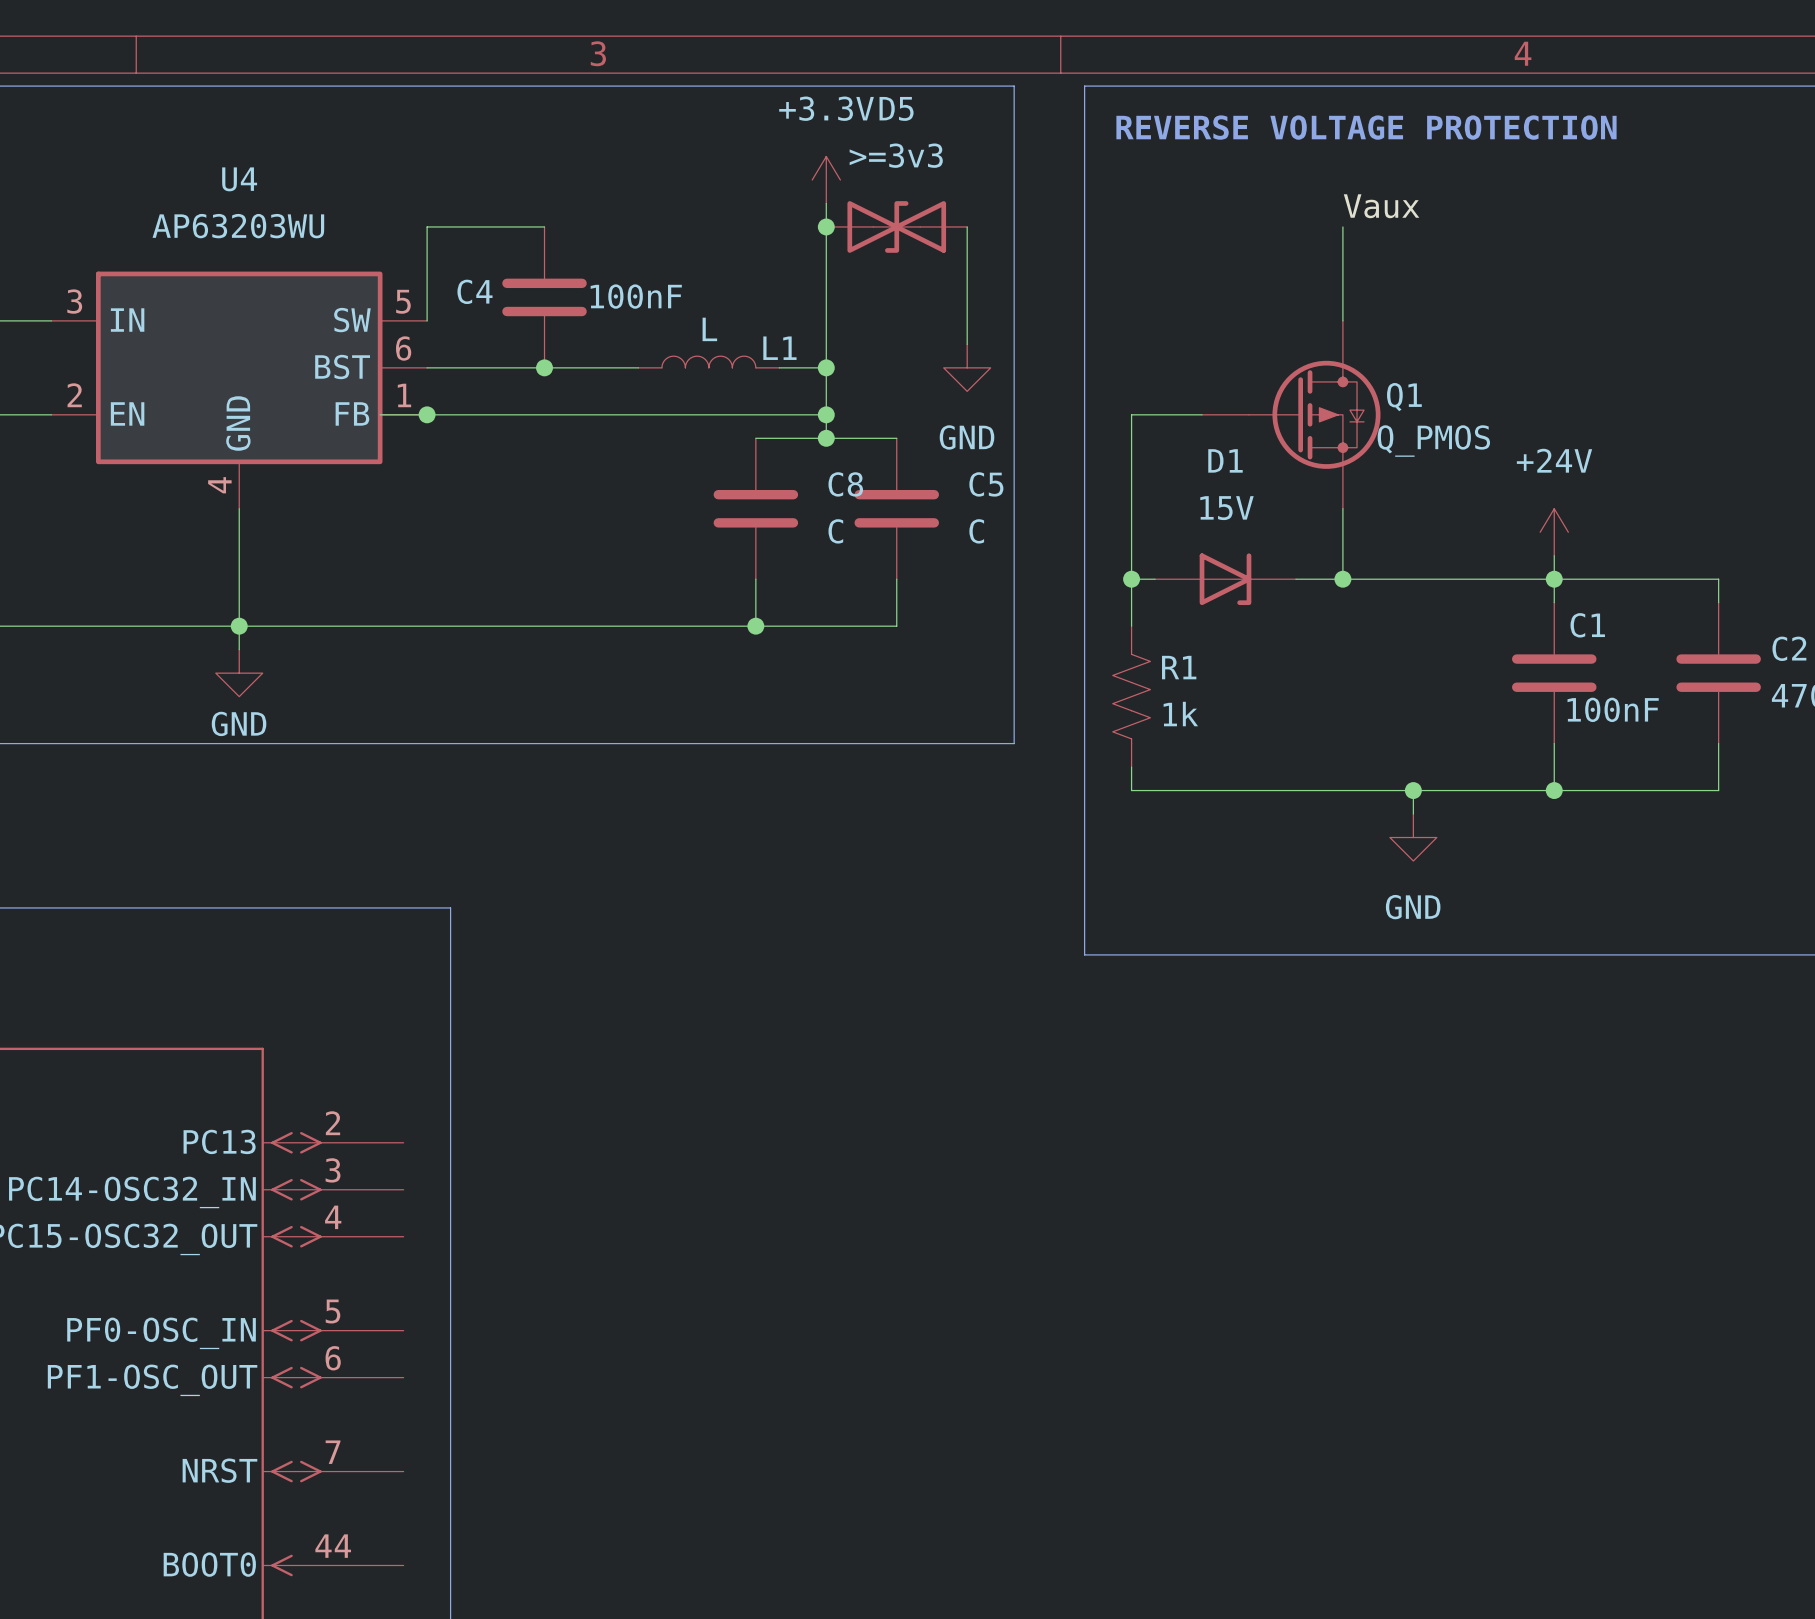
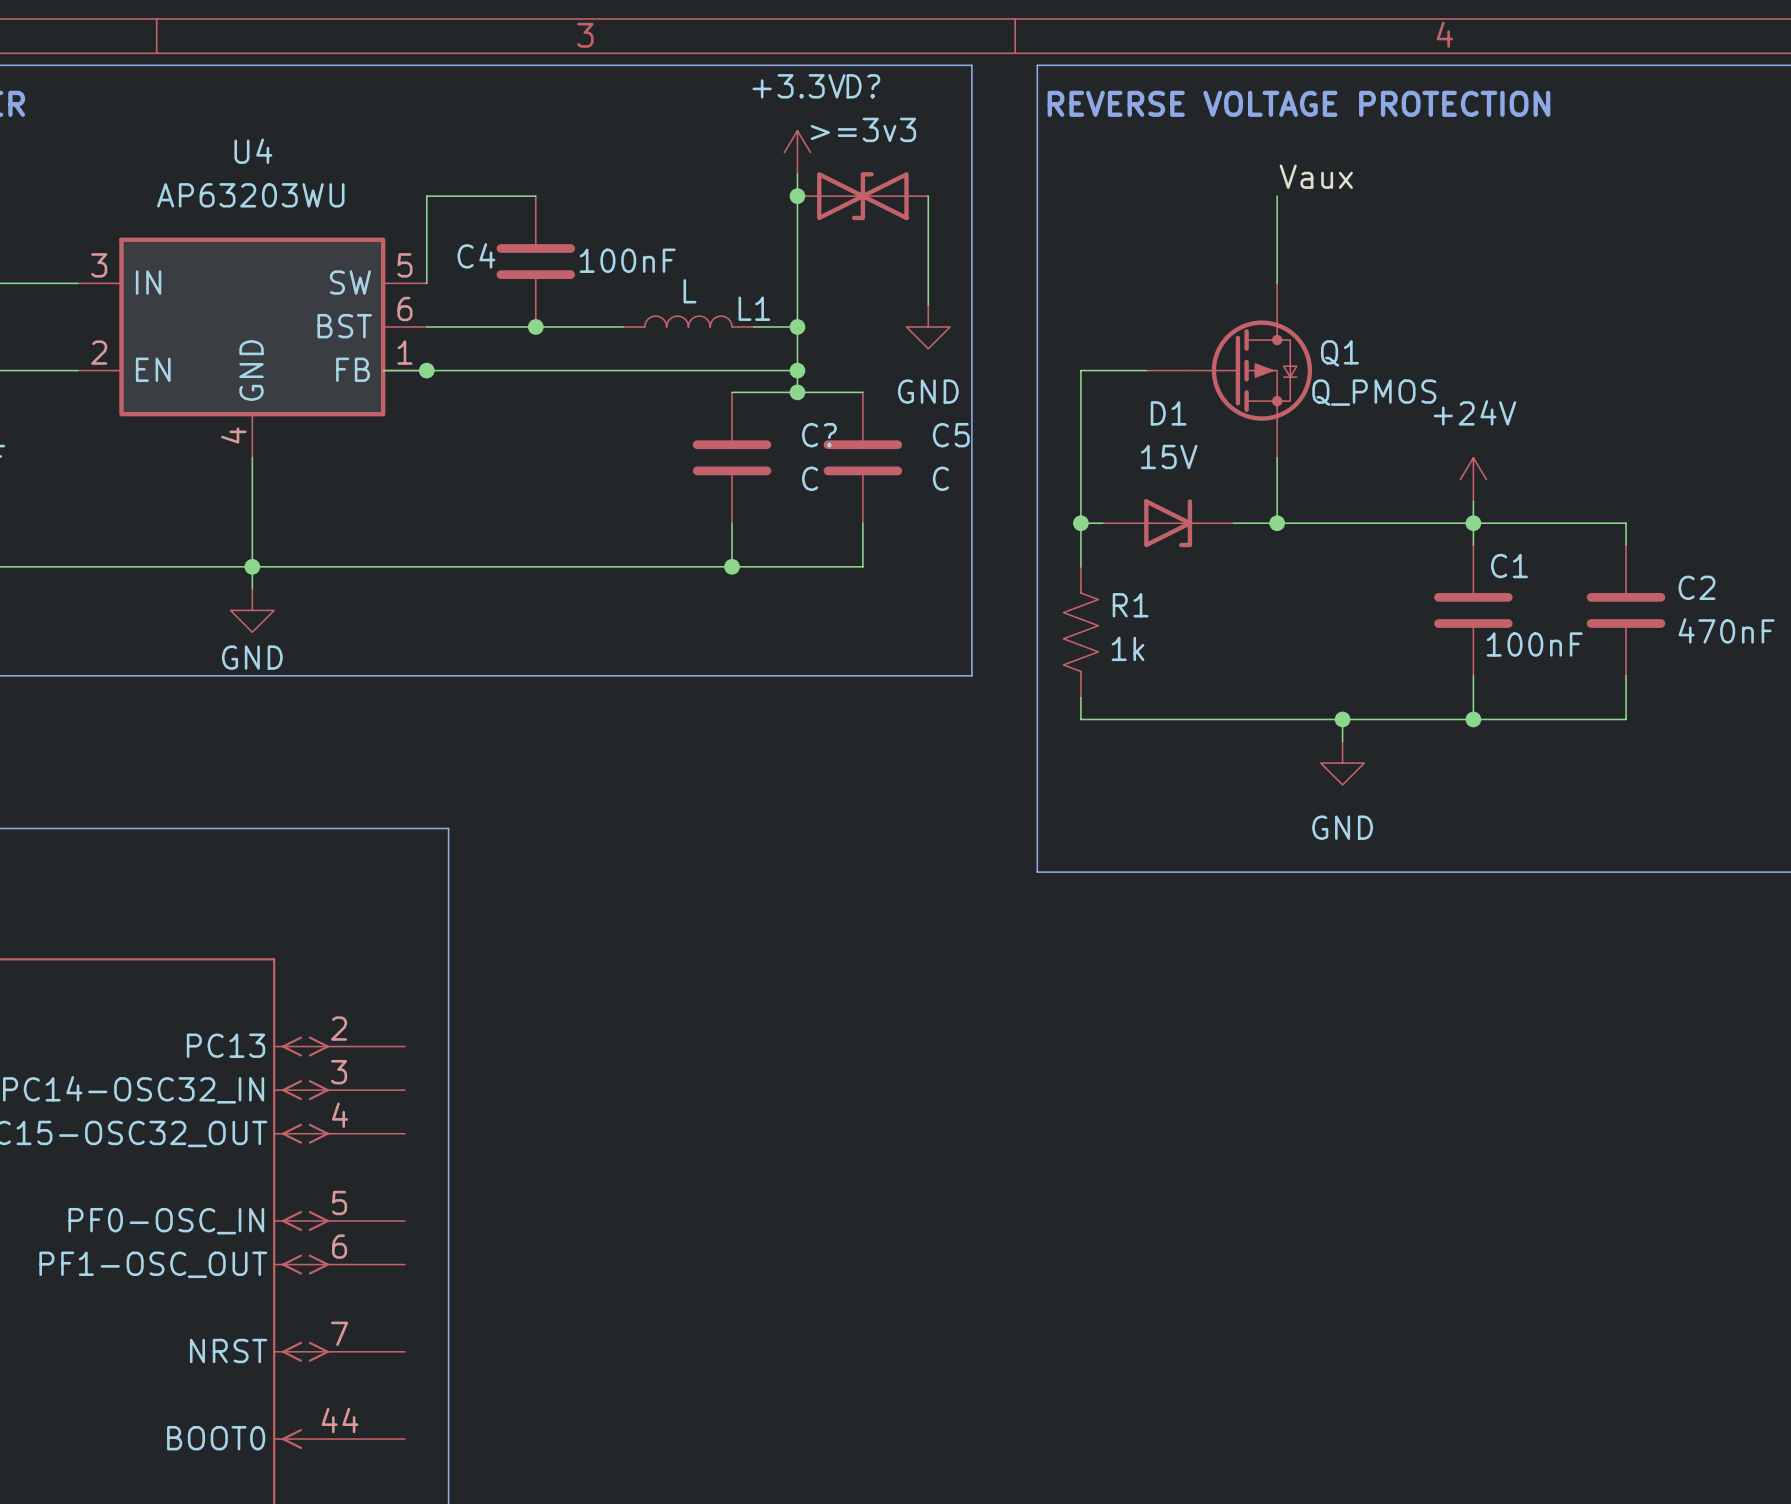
D5 name: D5 (896, 108) -> D? (863, 86)
C8 name: C8 (845, 484) -> C? (819, 435)

